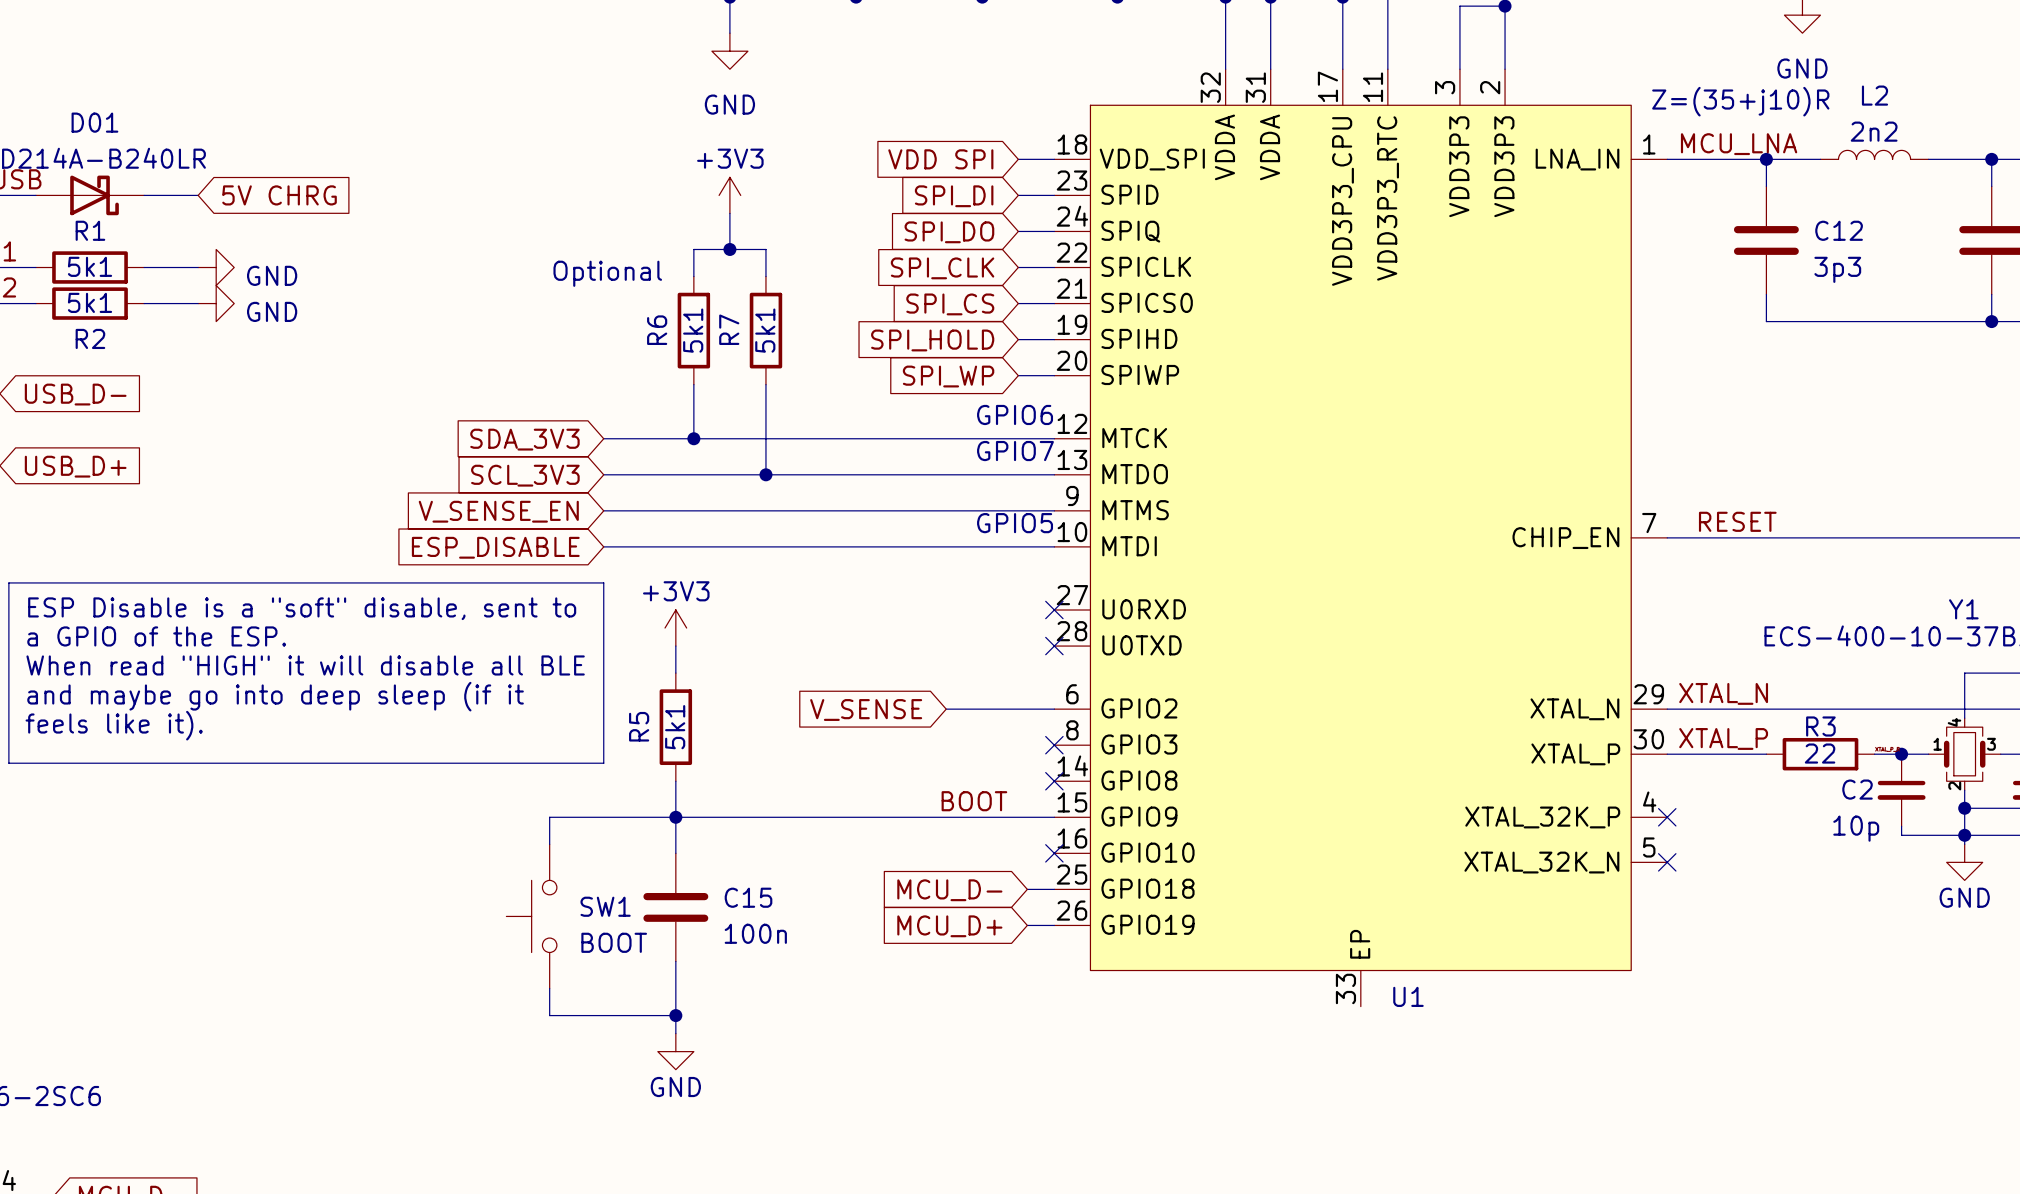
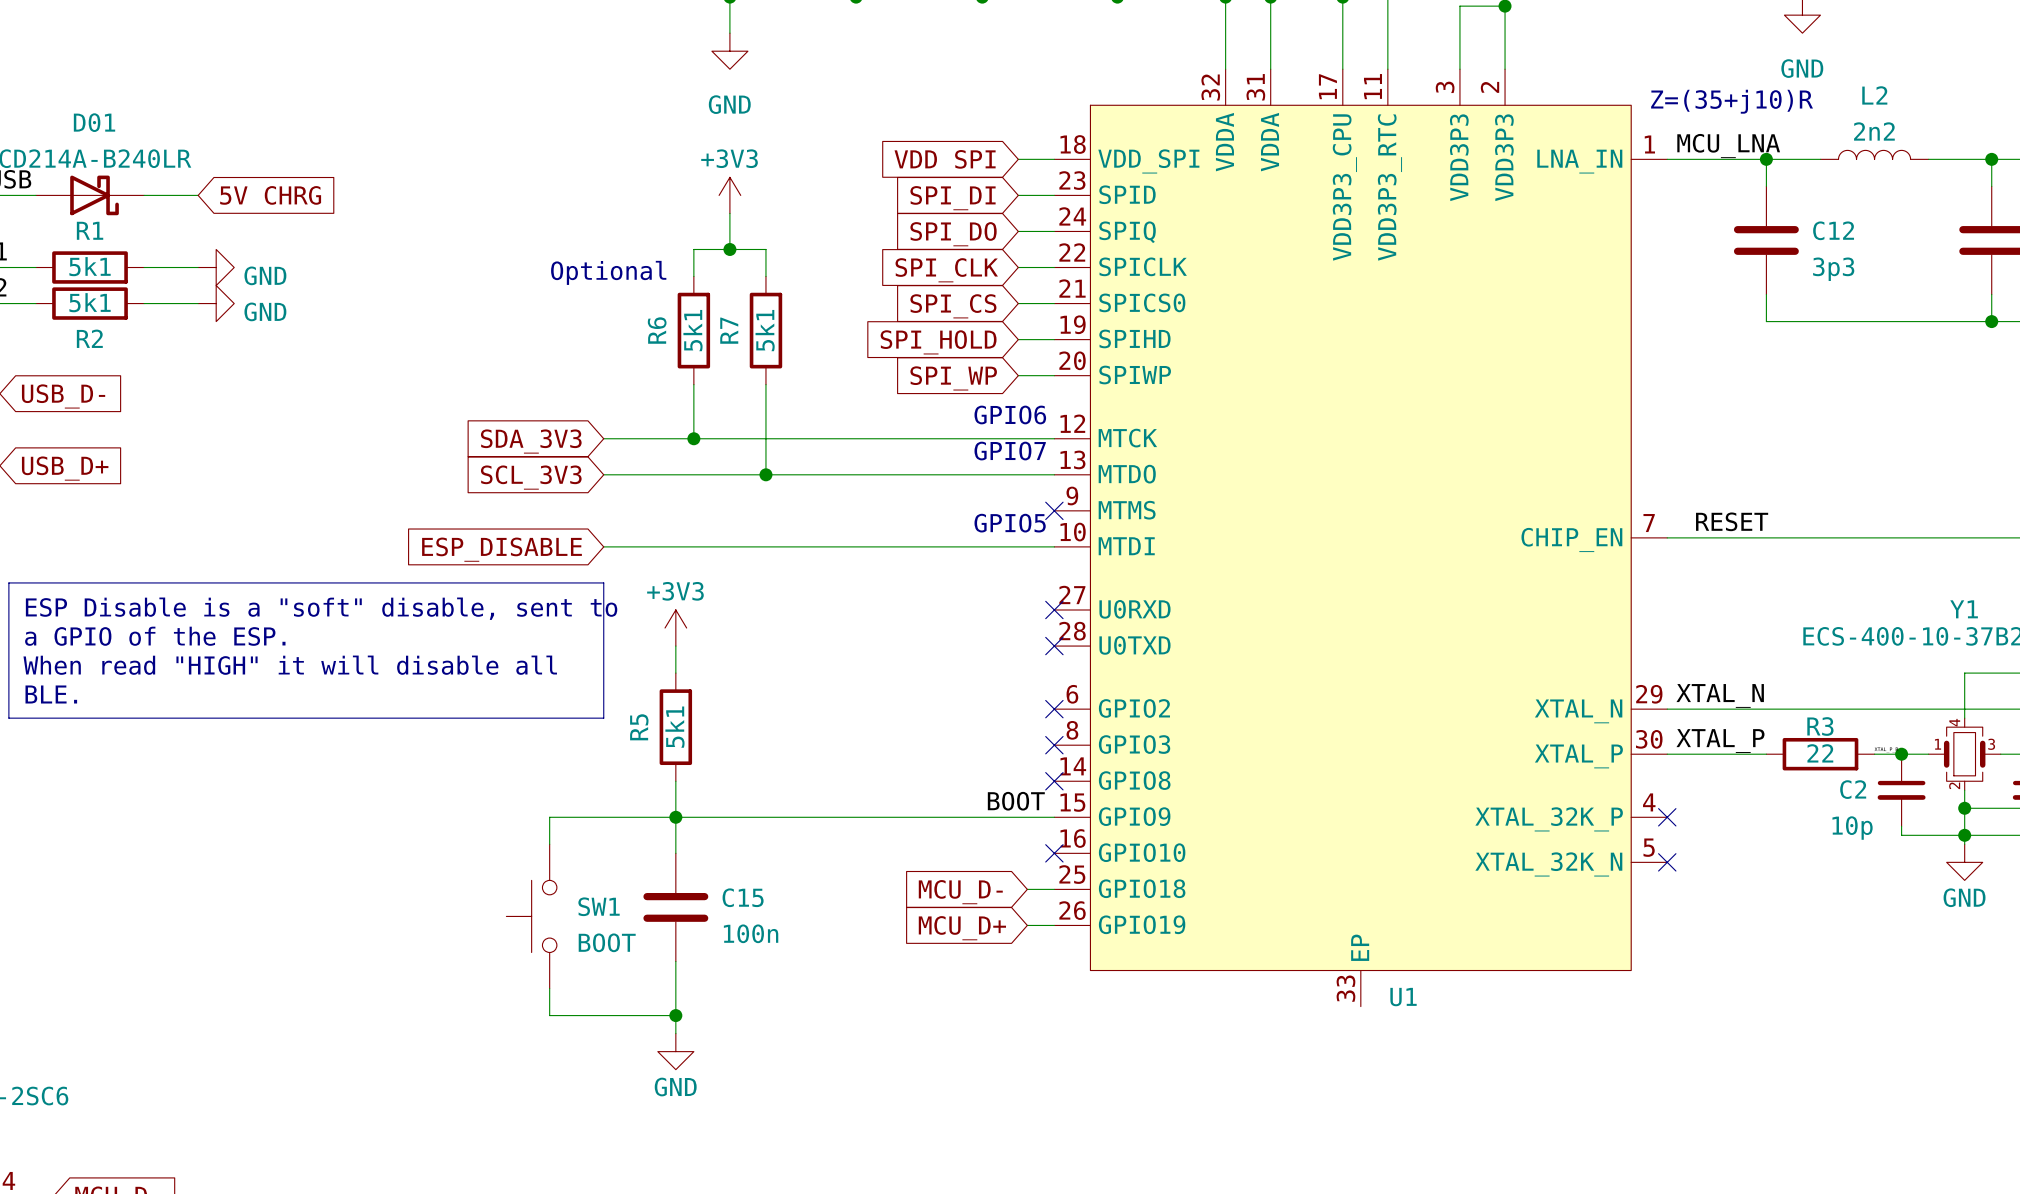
wire: (603, 510) (1054, 510) -> none
no-connect mark: none -> (1054, 510)
global label: V_SENSE_EN (498, 511) -> none
text: When read "HIGH" it will disable all BLE (305, 665) -> When read "HIGH" it will disable all (290, 665)
text: and maybe go into deep sleep (if it (275, 696) -> BLE. (51, 694)
wire: (946, 709) (1054, 709) -> none
no-connect mark: none -> (1054, 709)
global label: V_SENSE (866, 710) -> none
line: (8, 718) (8, 763) (603, 763) (603, 718) -> (8, 718) (603, 718)
text: feels like it). (114, 725) -> none
label position: BOOT (974, 801) -> BOOT (1016, 801)

